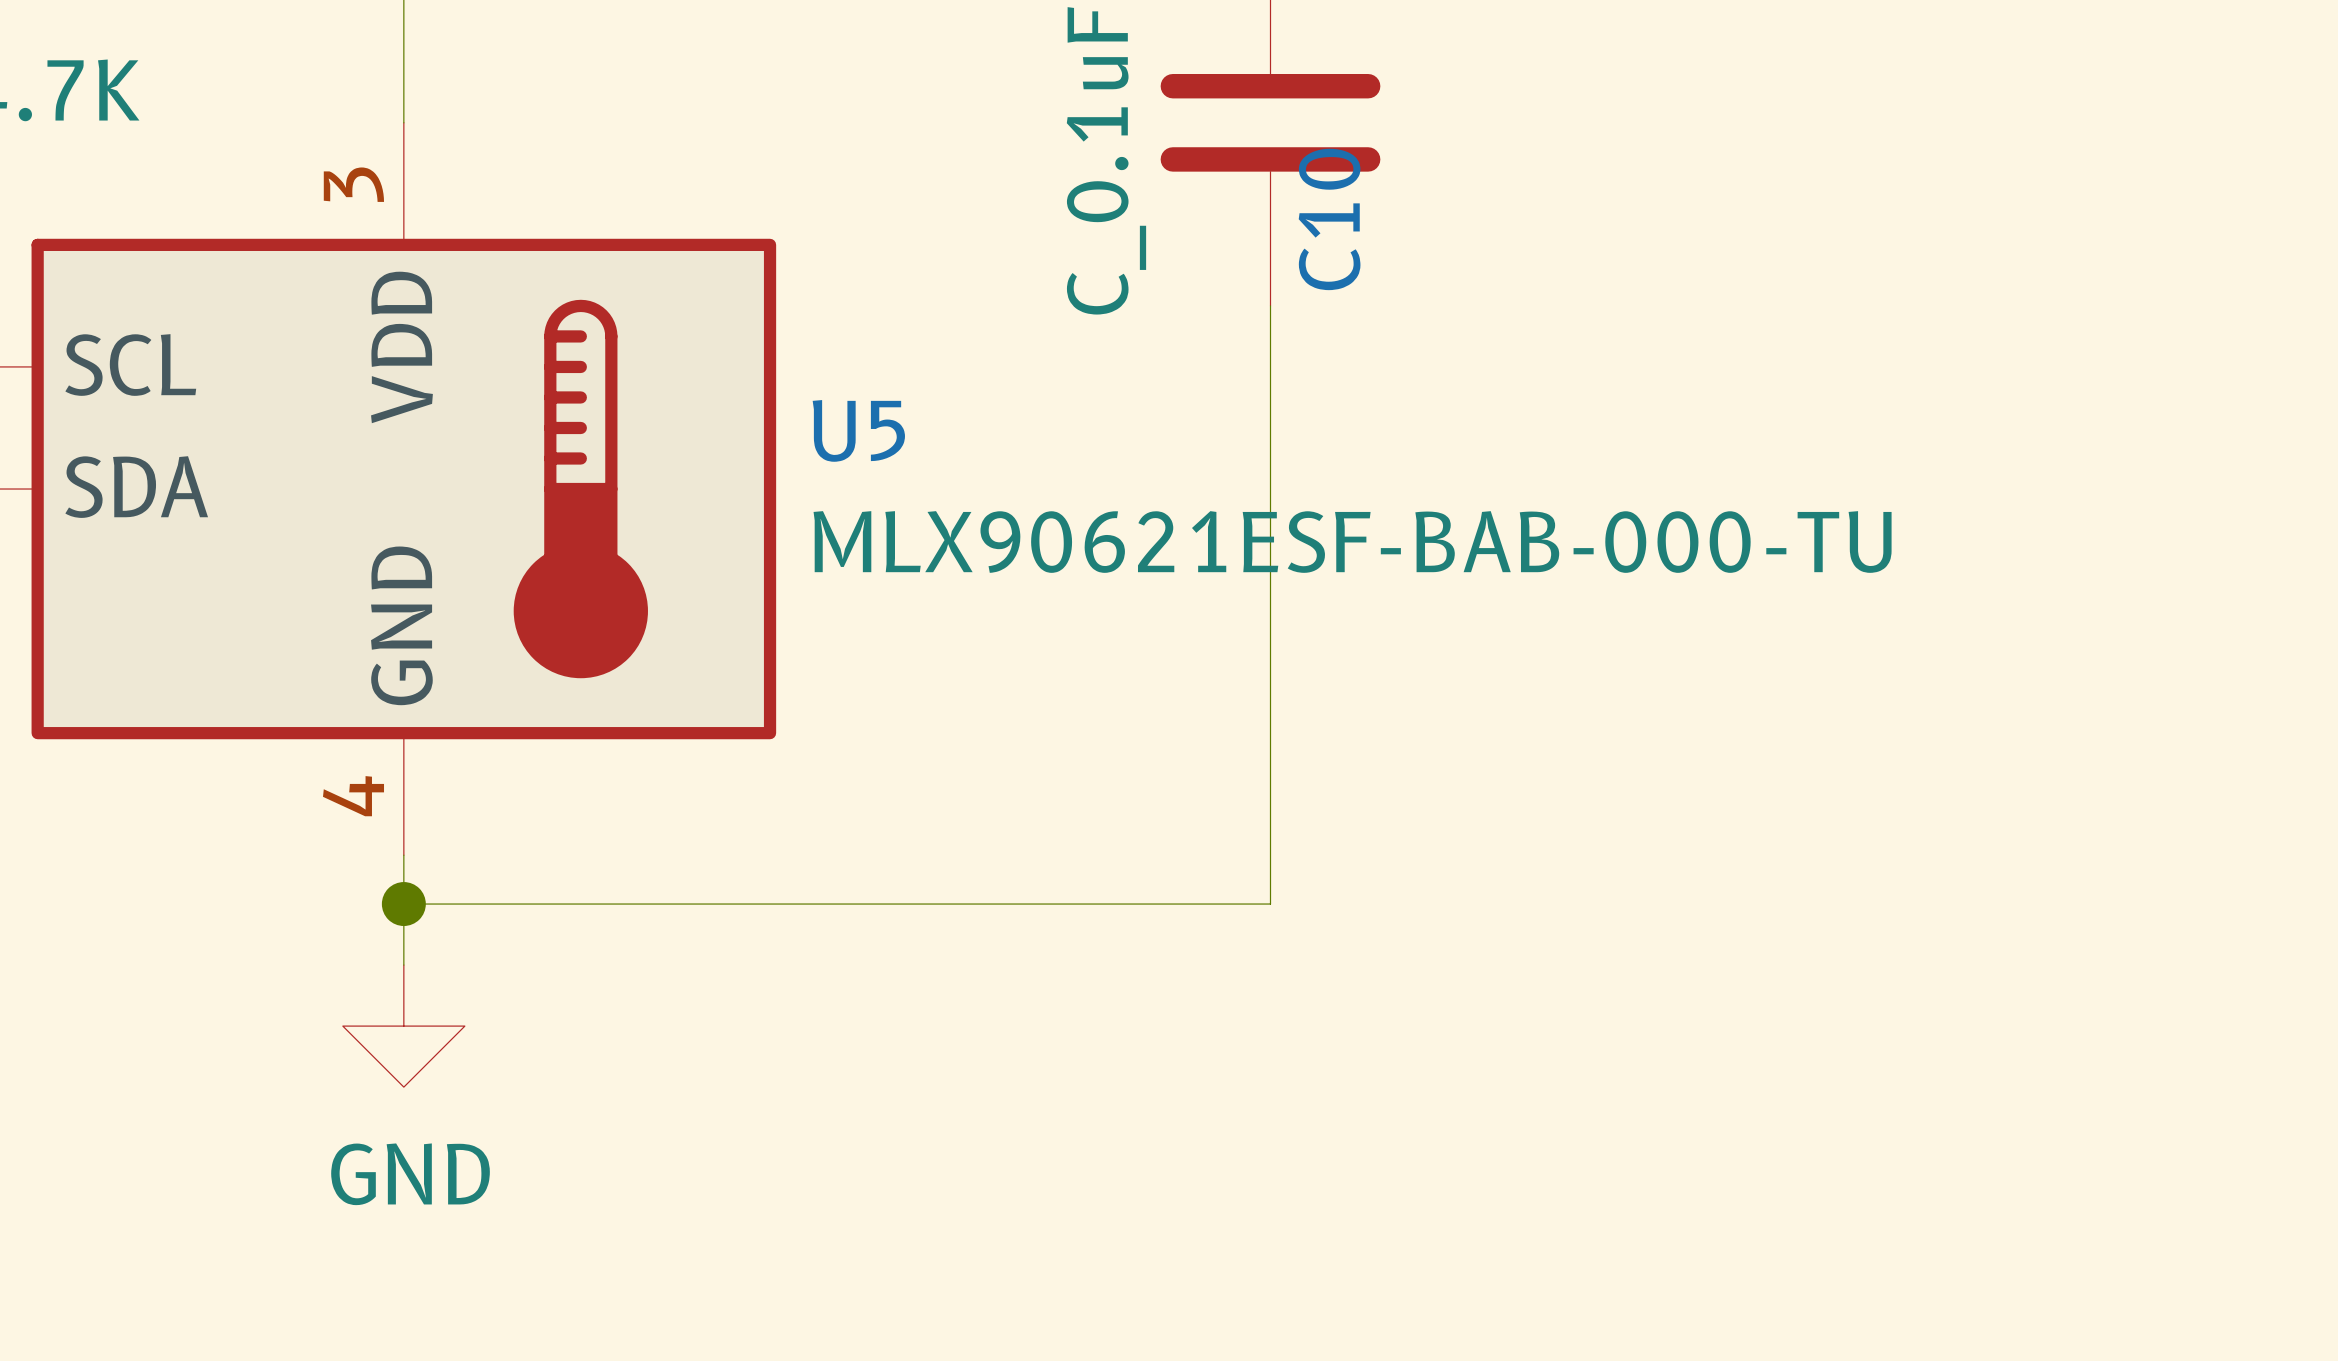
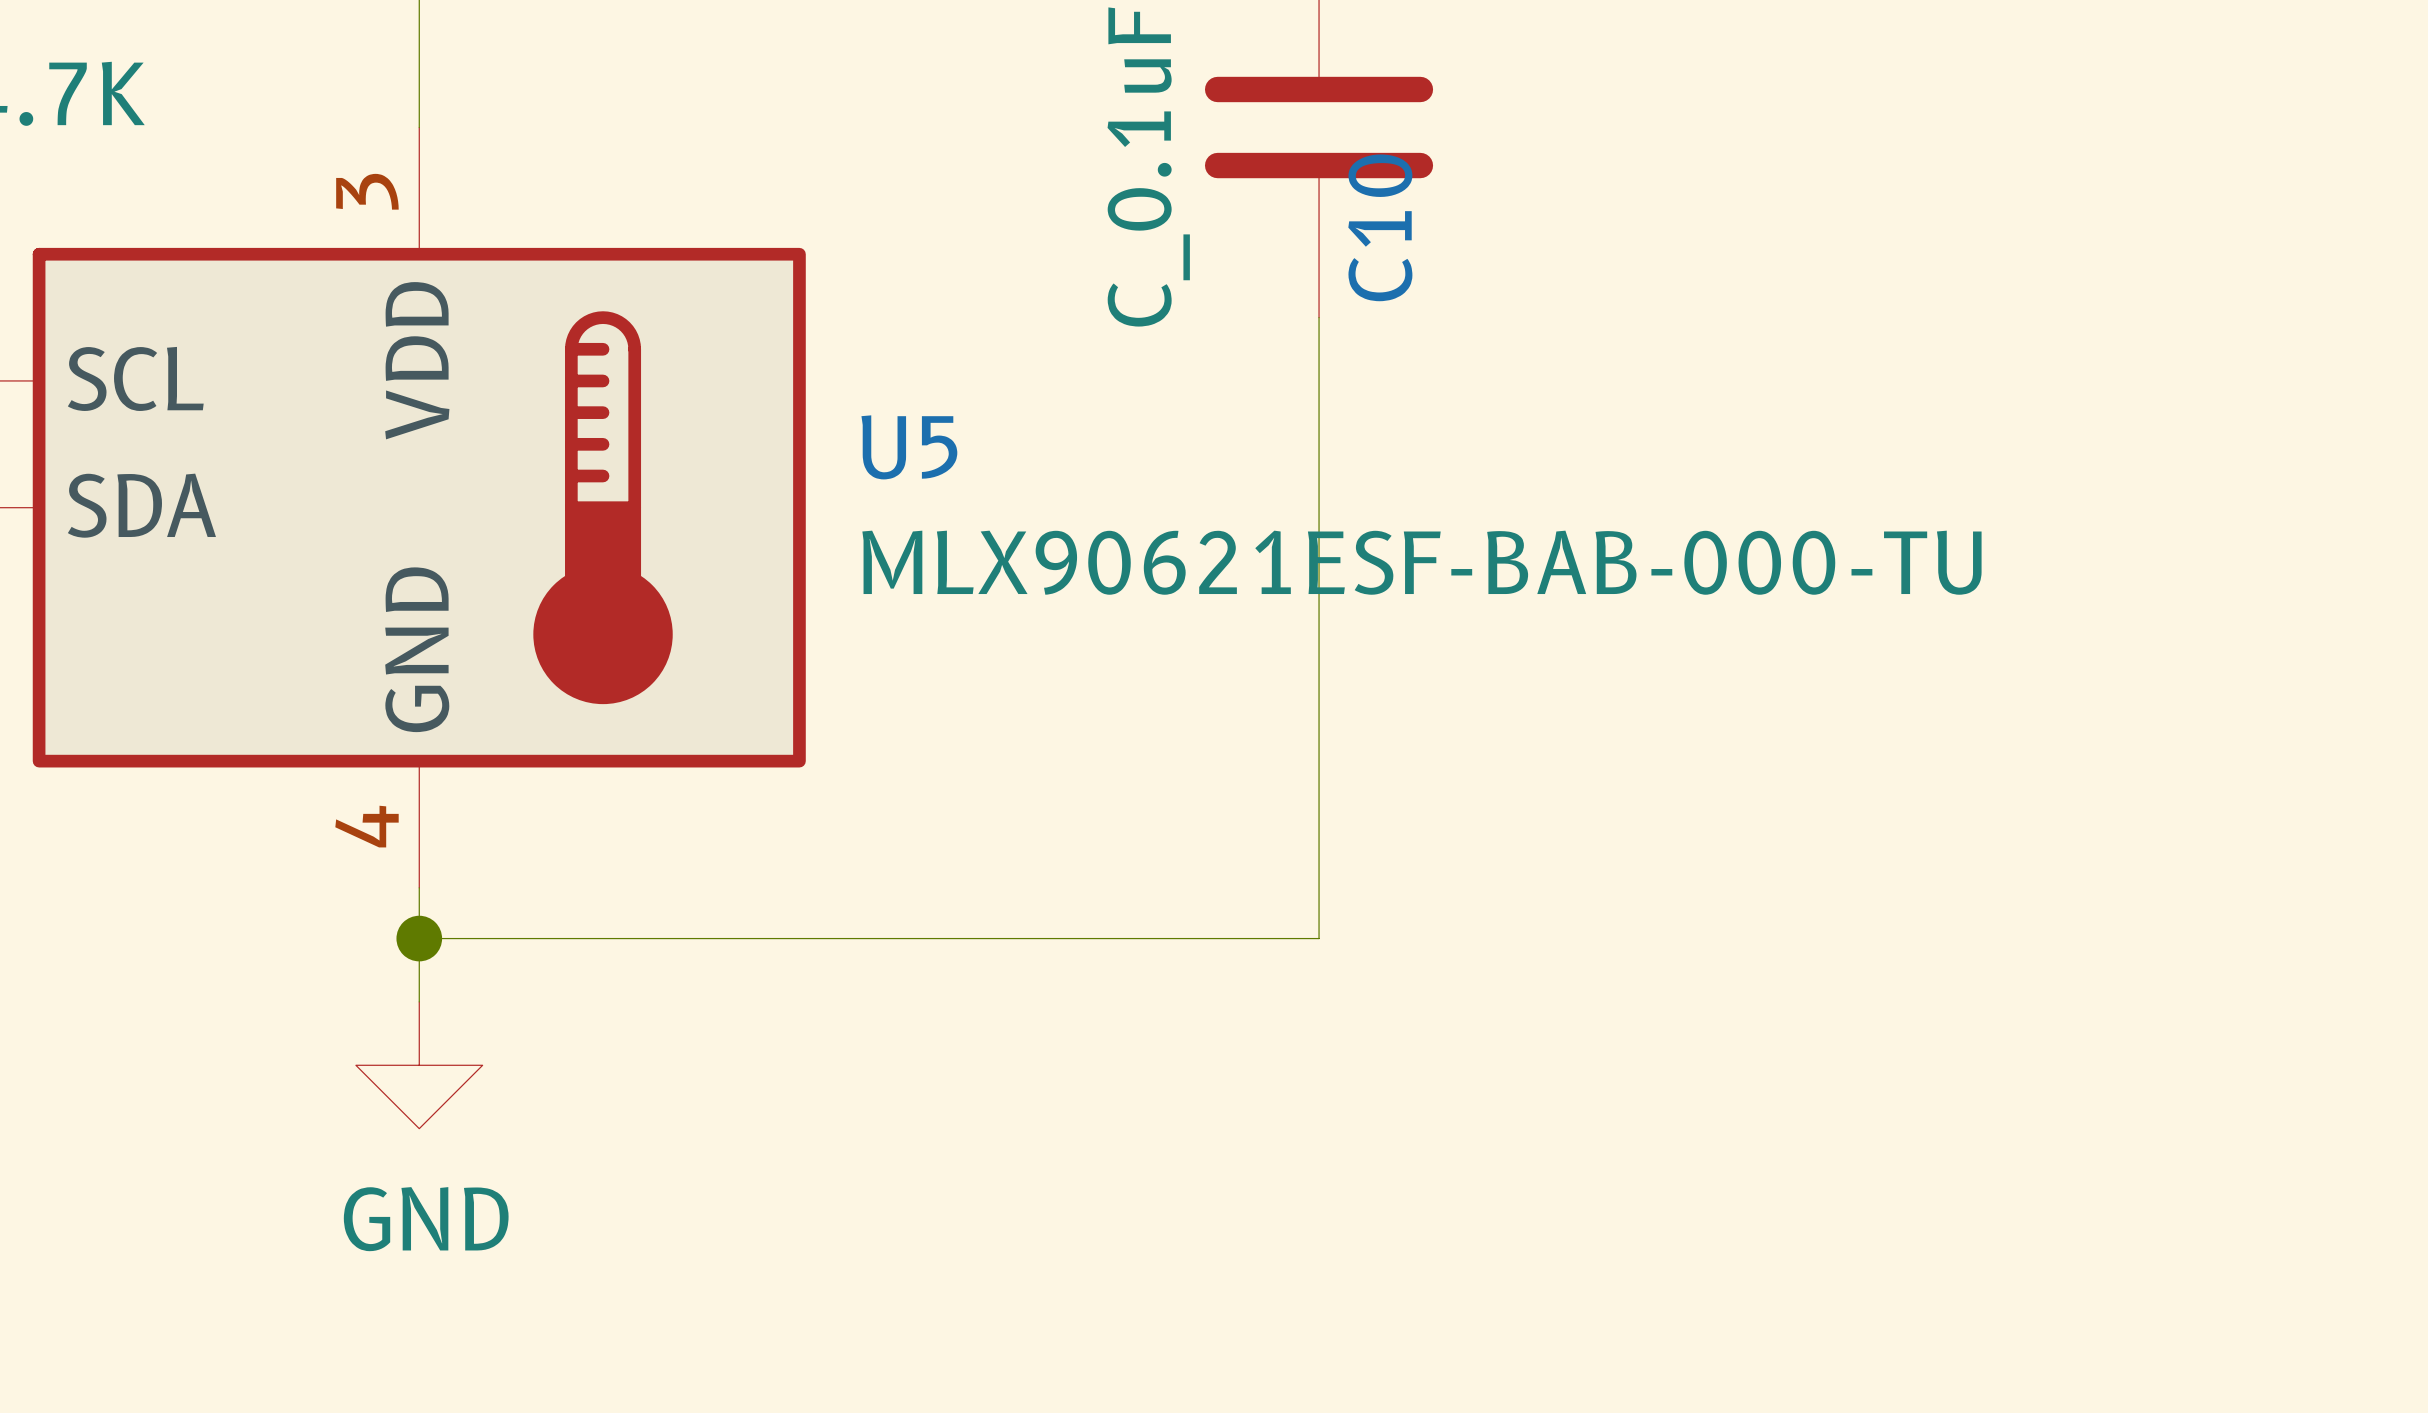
U5 name position: U5 (858, 430) -> U5 (909, 447)
U5 value position: MLX90621ESF-BAB-000-TU (1352, 542) -> MLX90621ESF-BAB-000-TU (1421, 562)

